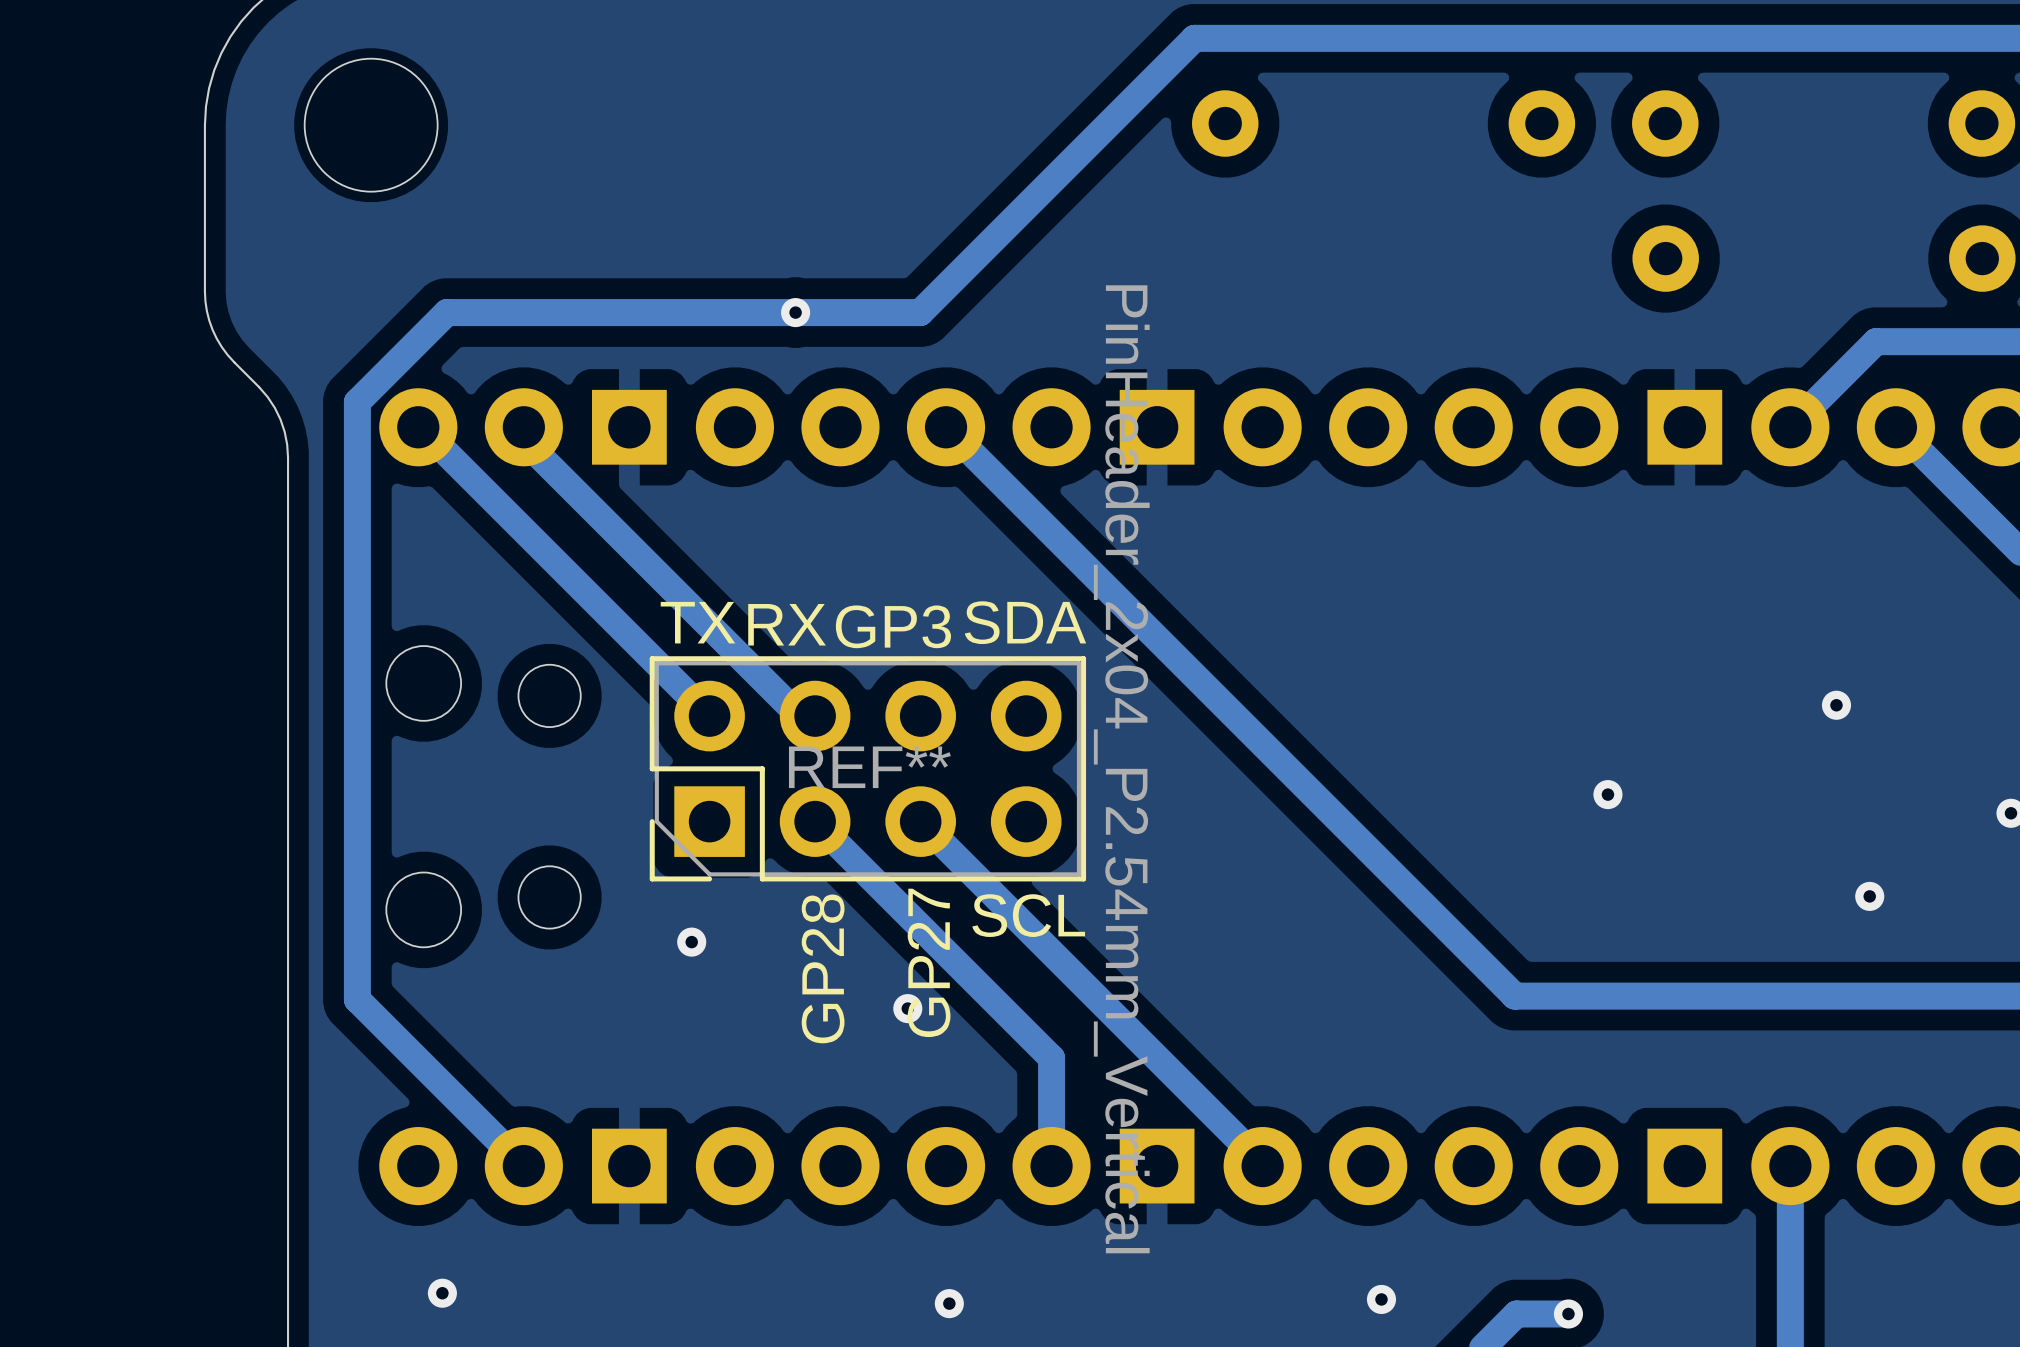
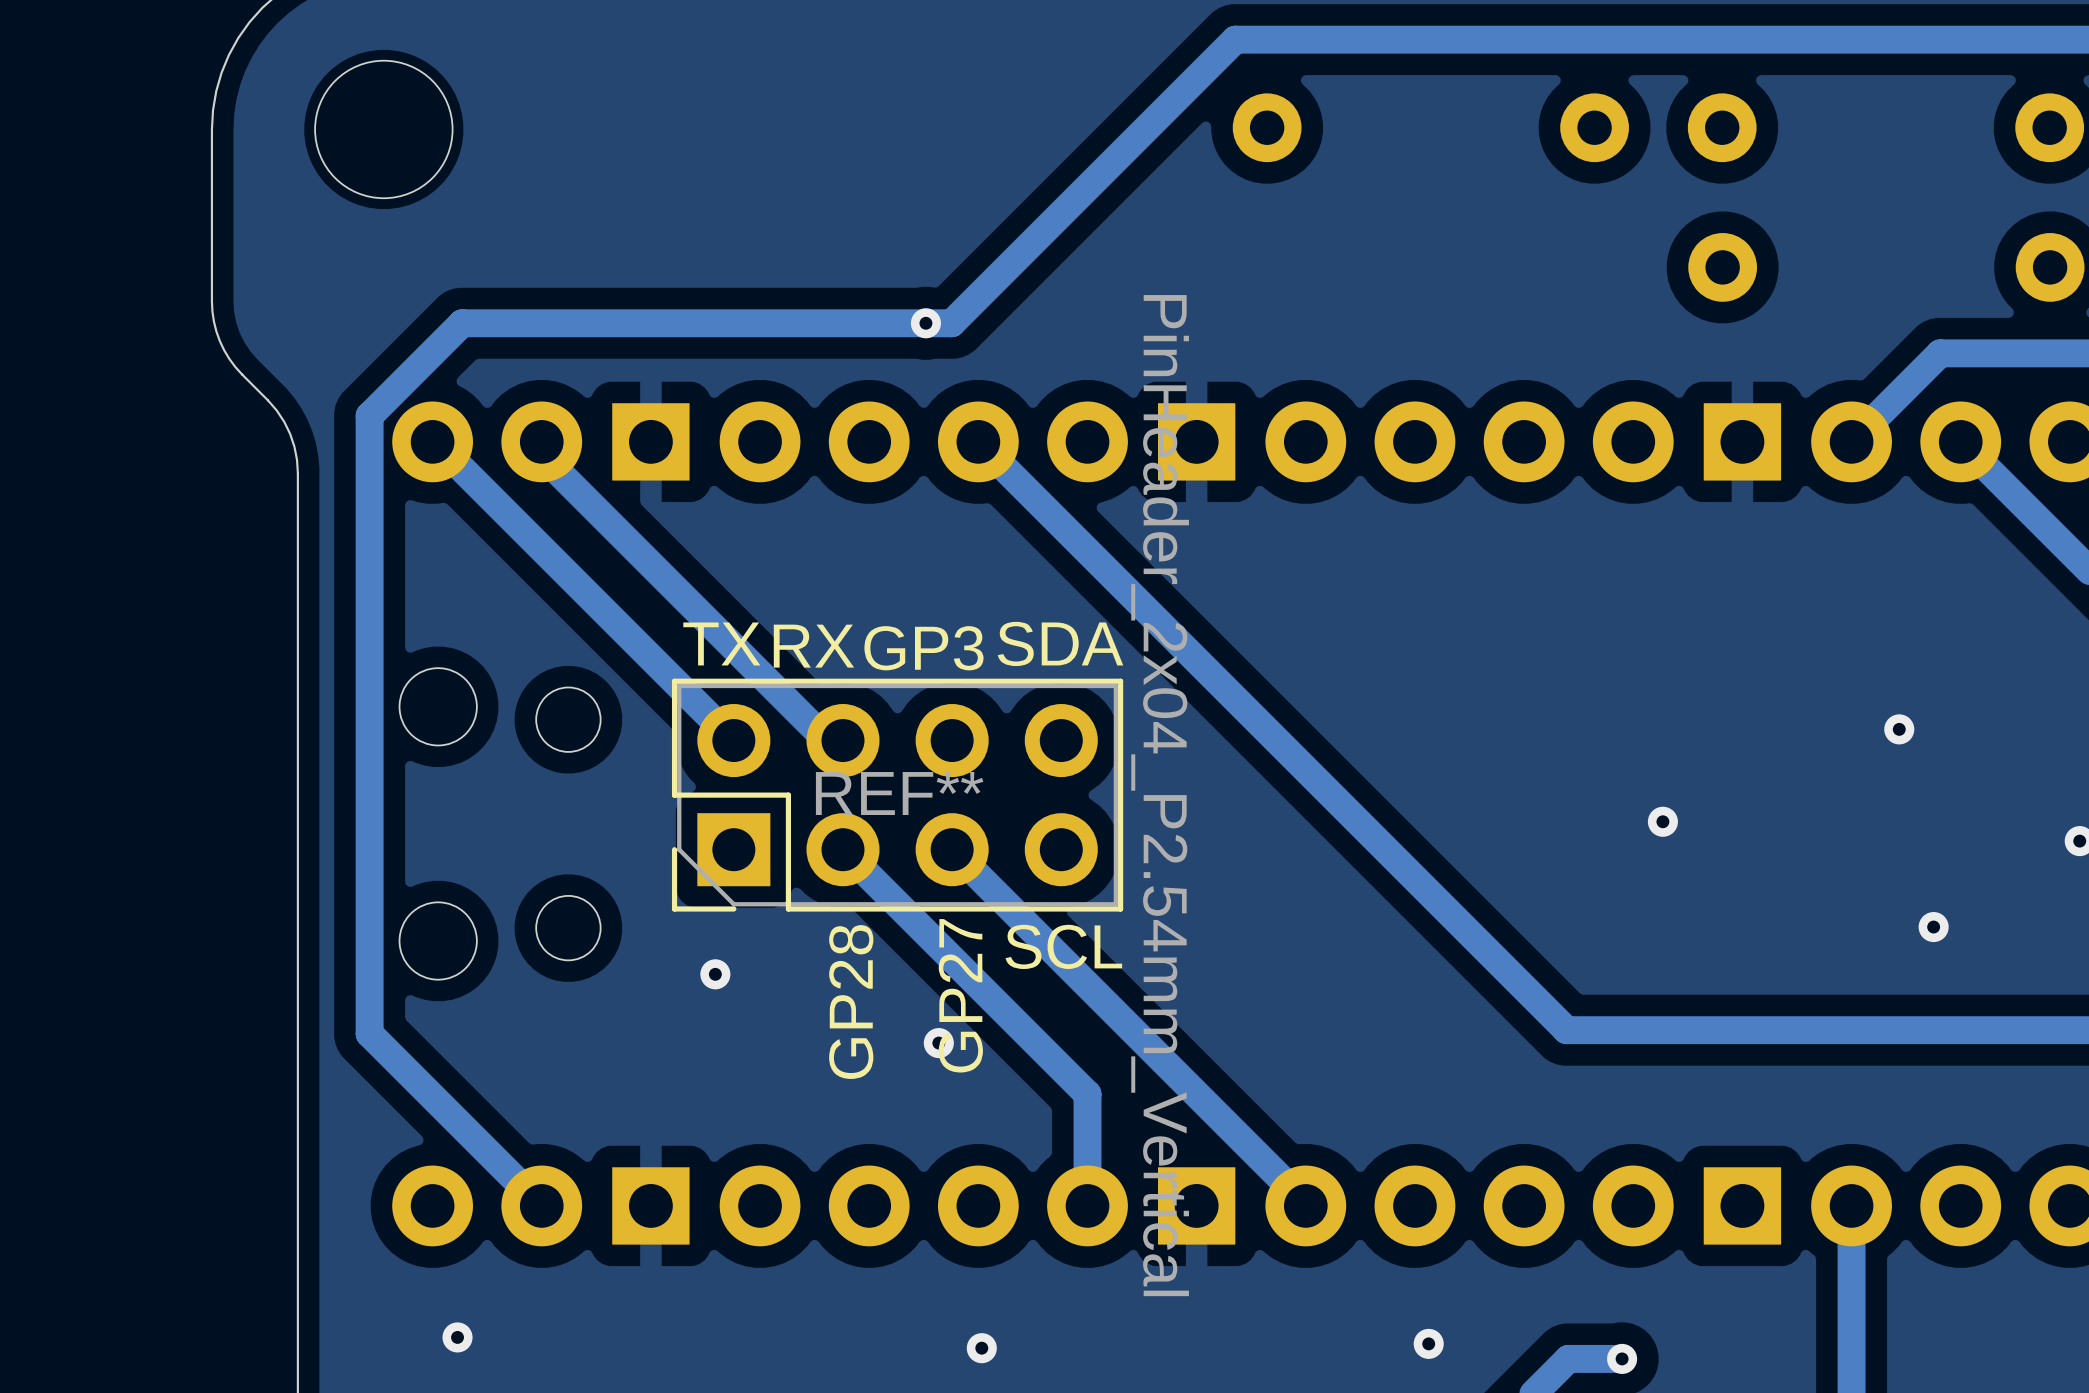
via position: (795, 312) -> (925, 323)

